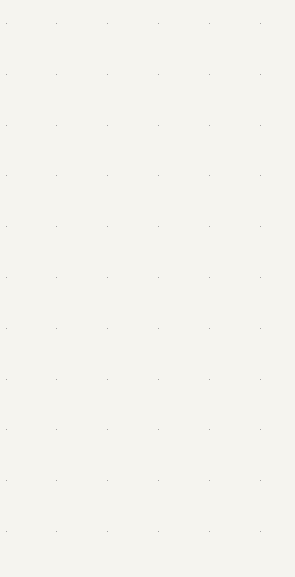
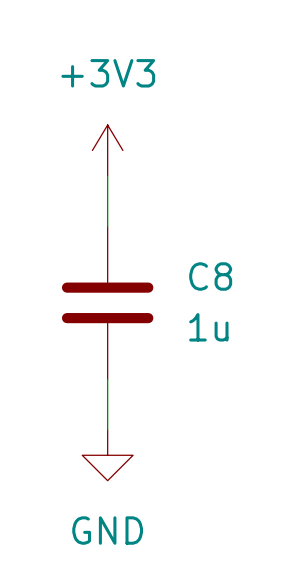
power symbol: none -> +3V3 (107, 150)
wire: none -> (107, 175) (107, 226)
C8: none -> 1u (107, 302)
wire: none -> (107, 379) (107, 429)
power symbol: none -> GND (107, 455)

